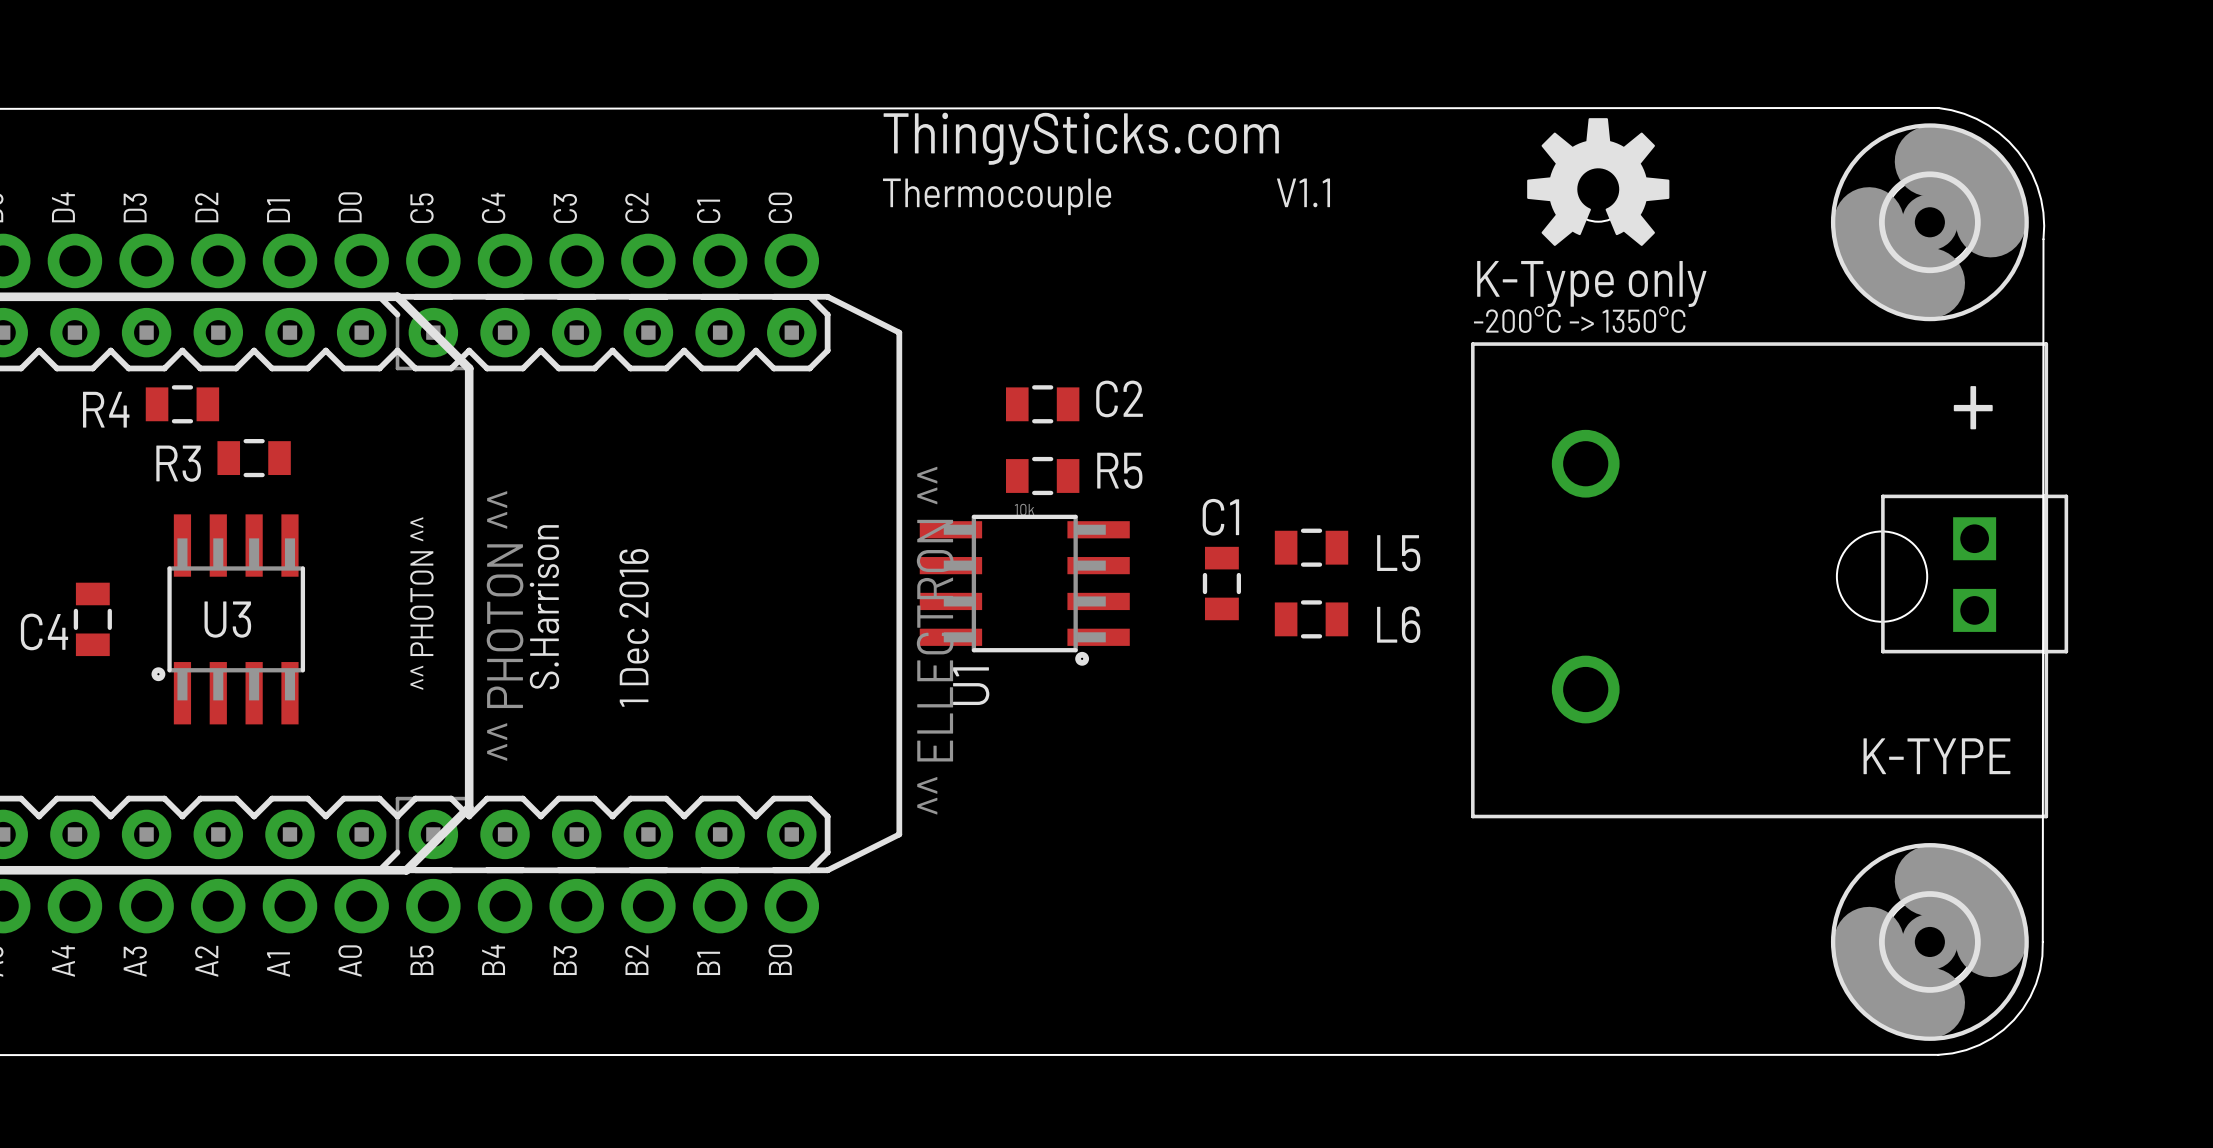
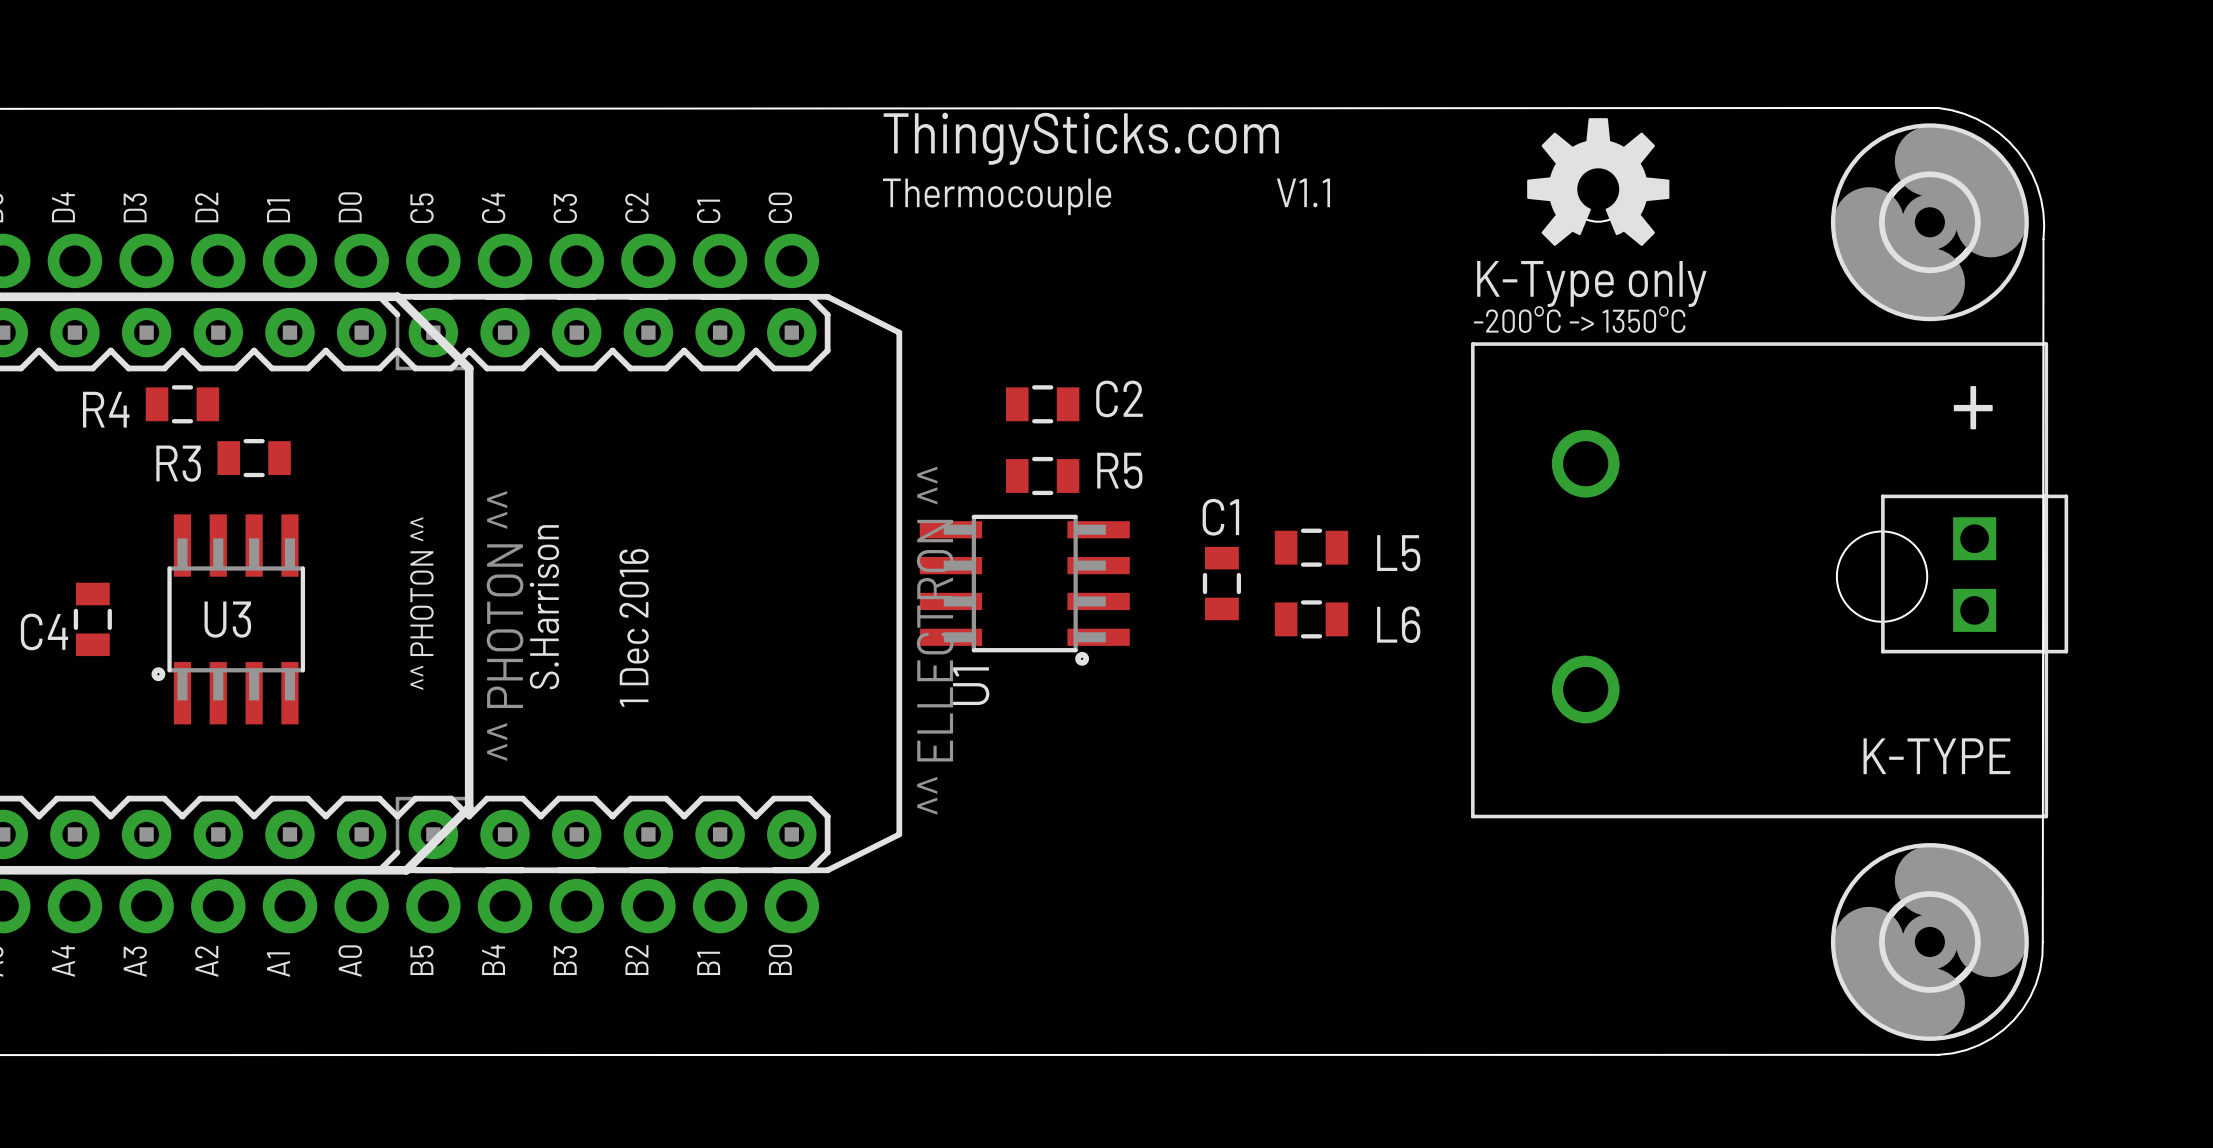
R5 value: 10k (1024, 509) -> none

